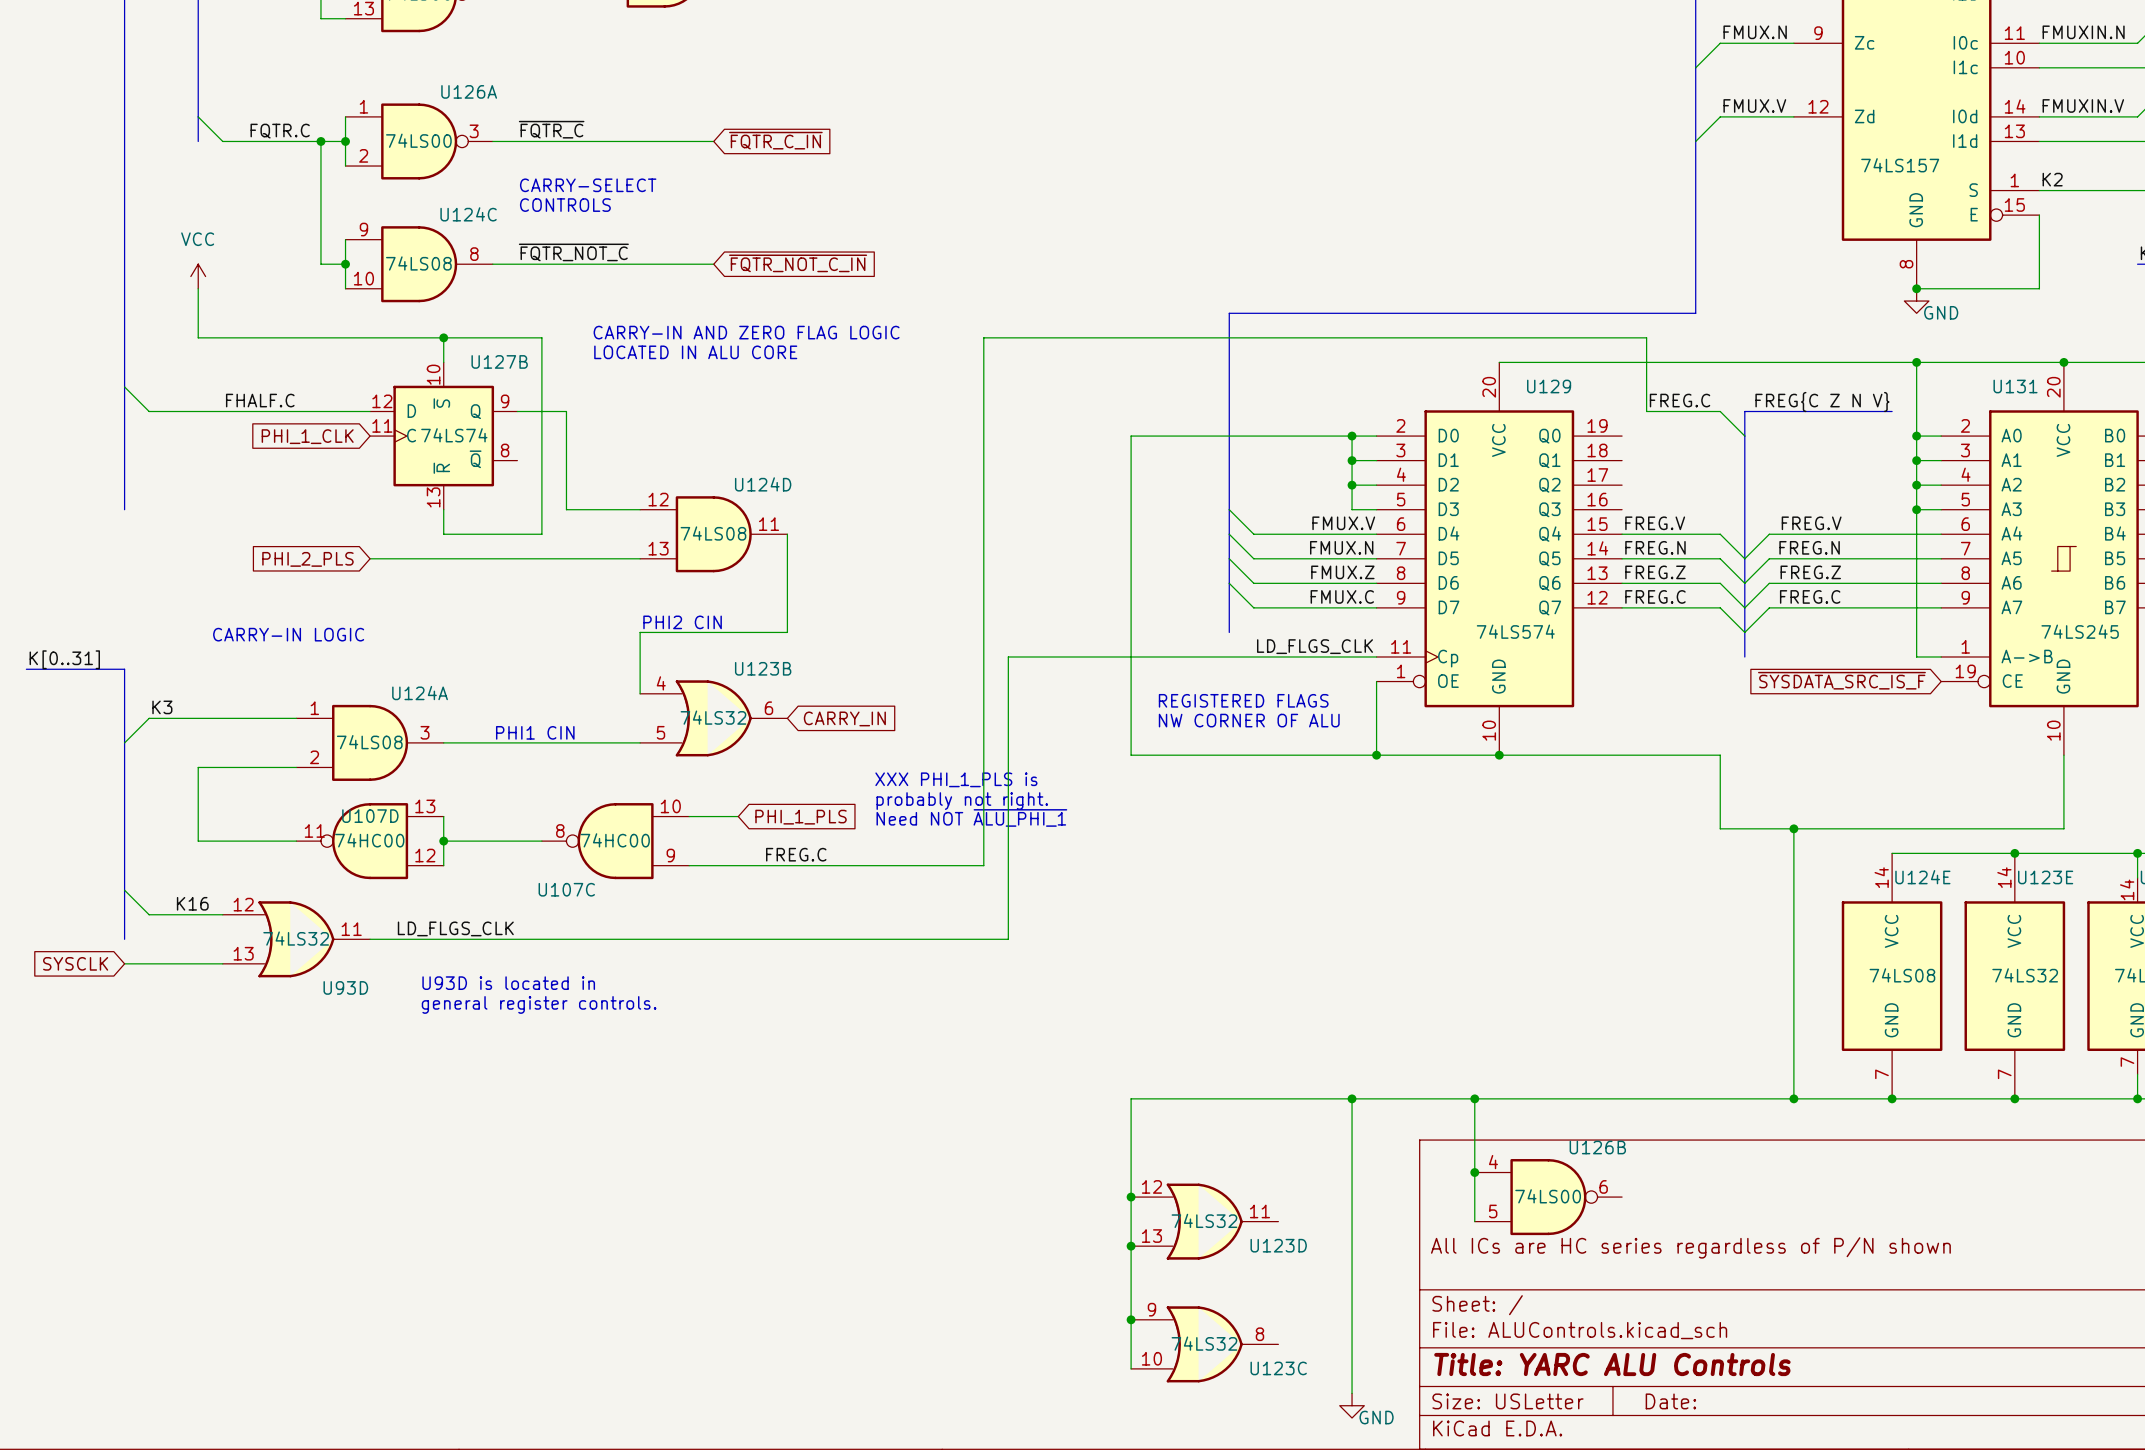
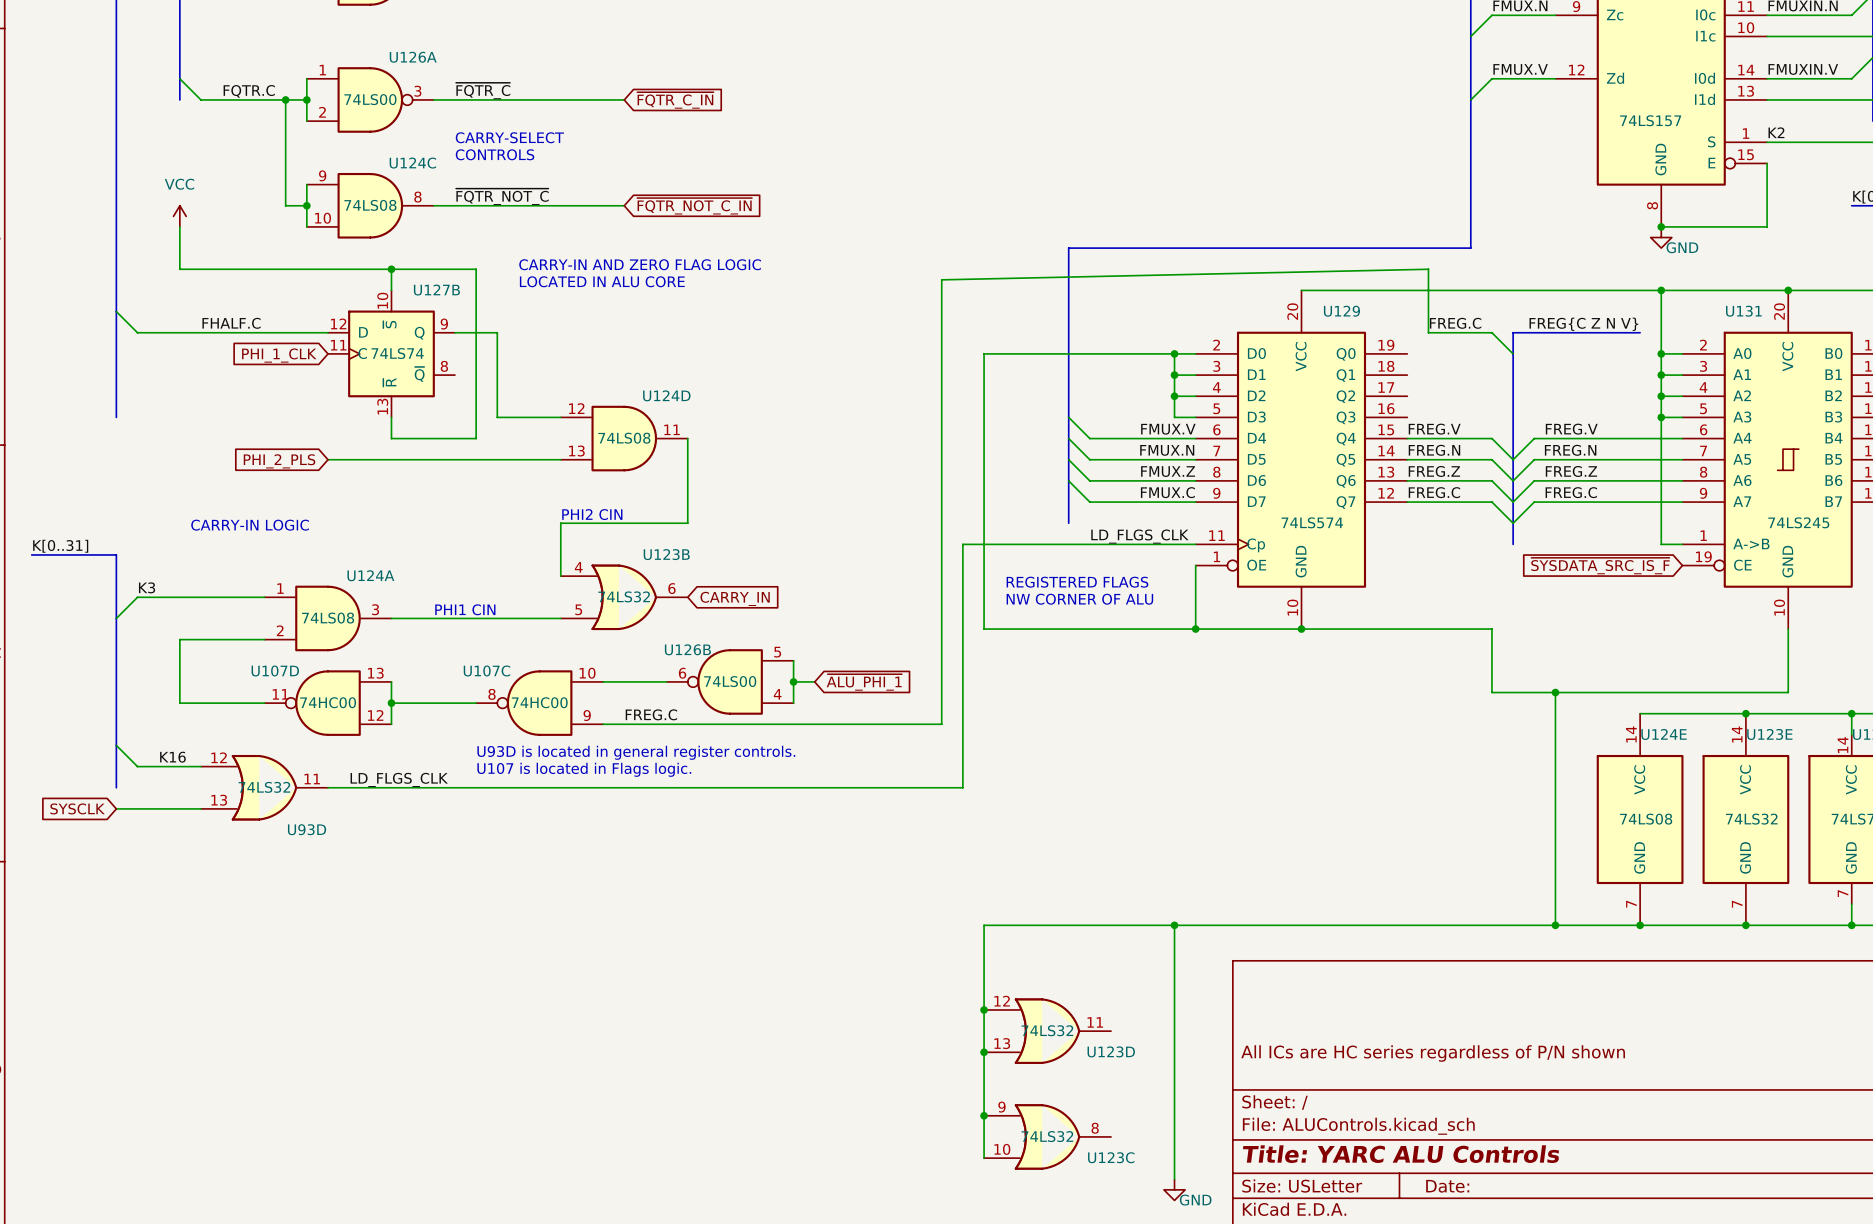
wire: (1646, 337) (983, 337) (983, 865) -> (1428, 269) (941, 279) (941, 724) (857, 724)
wire: (1106, 656) (1008, 656) (1008, 939) -> (962, 544) (962, 787) (878, 787)
text: XXX PHI_1_PLS is (956, 779) -> none
wire: none -> (793, 660) (793, 703)
text: probably not right. (962, 801) -> none
global label: none -> ~{ALU_PHI_1} (864, 682)
U107D name position: U107D (370, 816) -> U107D (275, 670)
wire: none -> (645, 681) (666, 681)
wire: none -> (793, 681) (814, 681)
junction: none -> (793, 681)
global label: PHI_1_PLS (801, 817) -> none
text: Need NOT ~{ALU_PHI_1} (971, 817) -> none
label position: FREG.C (796, 854) -> FREG.C (651, 714)
U107C name position: U107C (566, 889) -> U107C (486, 670)
text: none -> U93D is located in general register controls. (636, 752)
text: none -> U107 is located in Flags logic. (584, 769)
text: U93D is located in (508, 983) -> none
text: general register controls. (539, 1004) -> none
wire: (1474, 1098) (1474, 1221) -> none
junction: (1474, 1098) -> none
U126B name position: U126B (1597, 1147) -> U126B (687, 649)
junction: (1474, 1172) -> none
U126B rotation: 0° (1548, 1197) -> 180° (730, 681)
U126B position: (1548, 1197) -> (730, 681)

